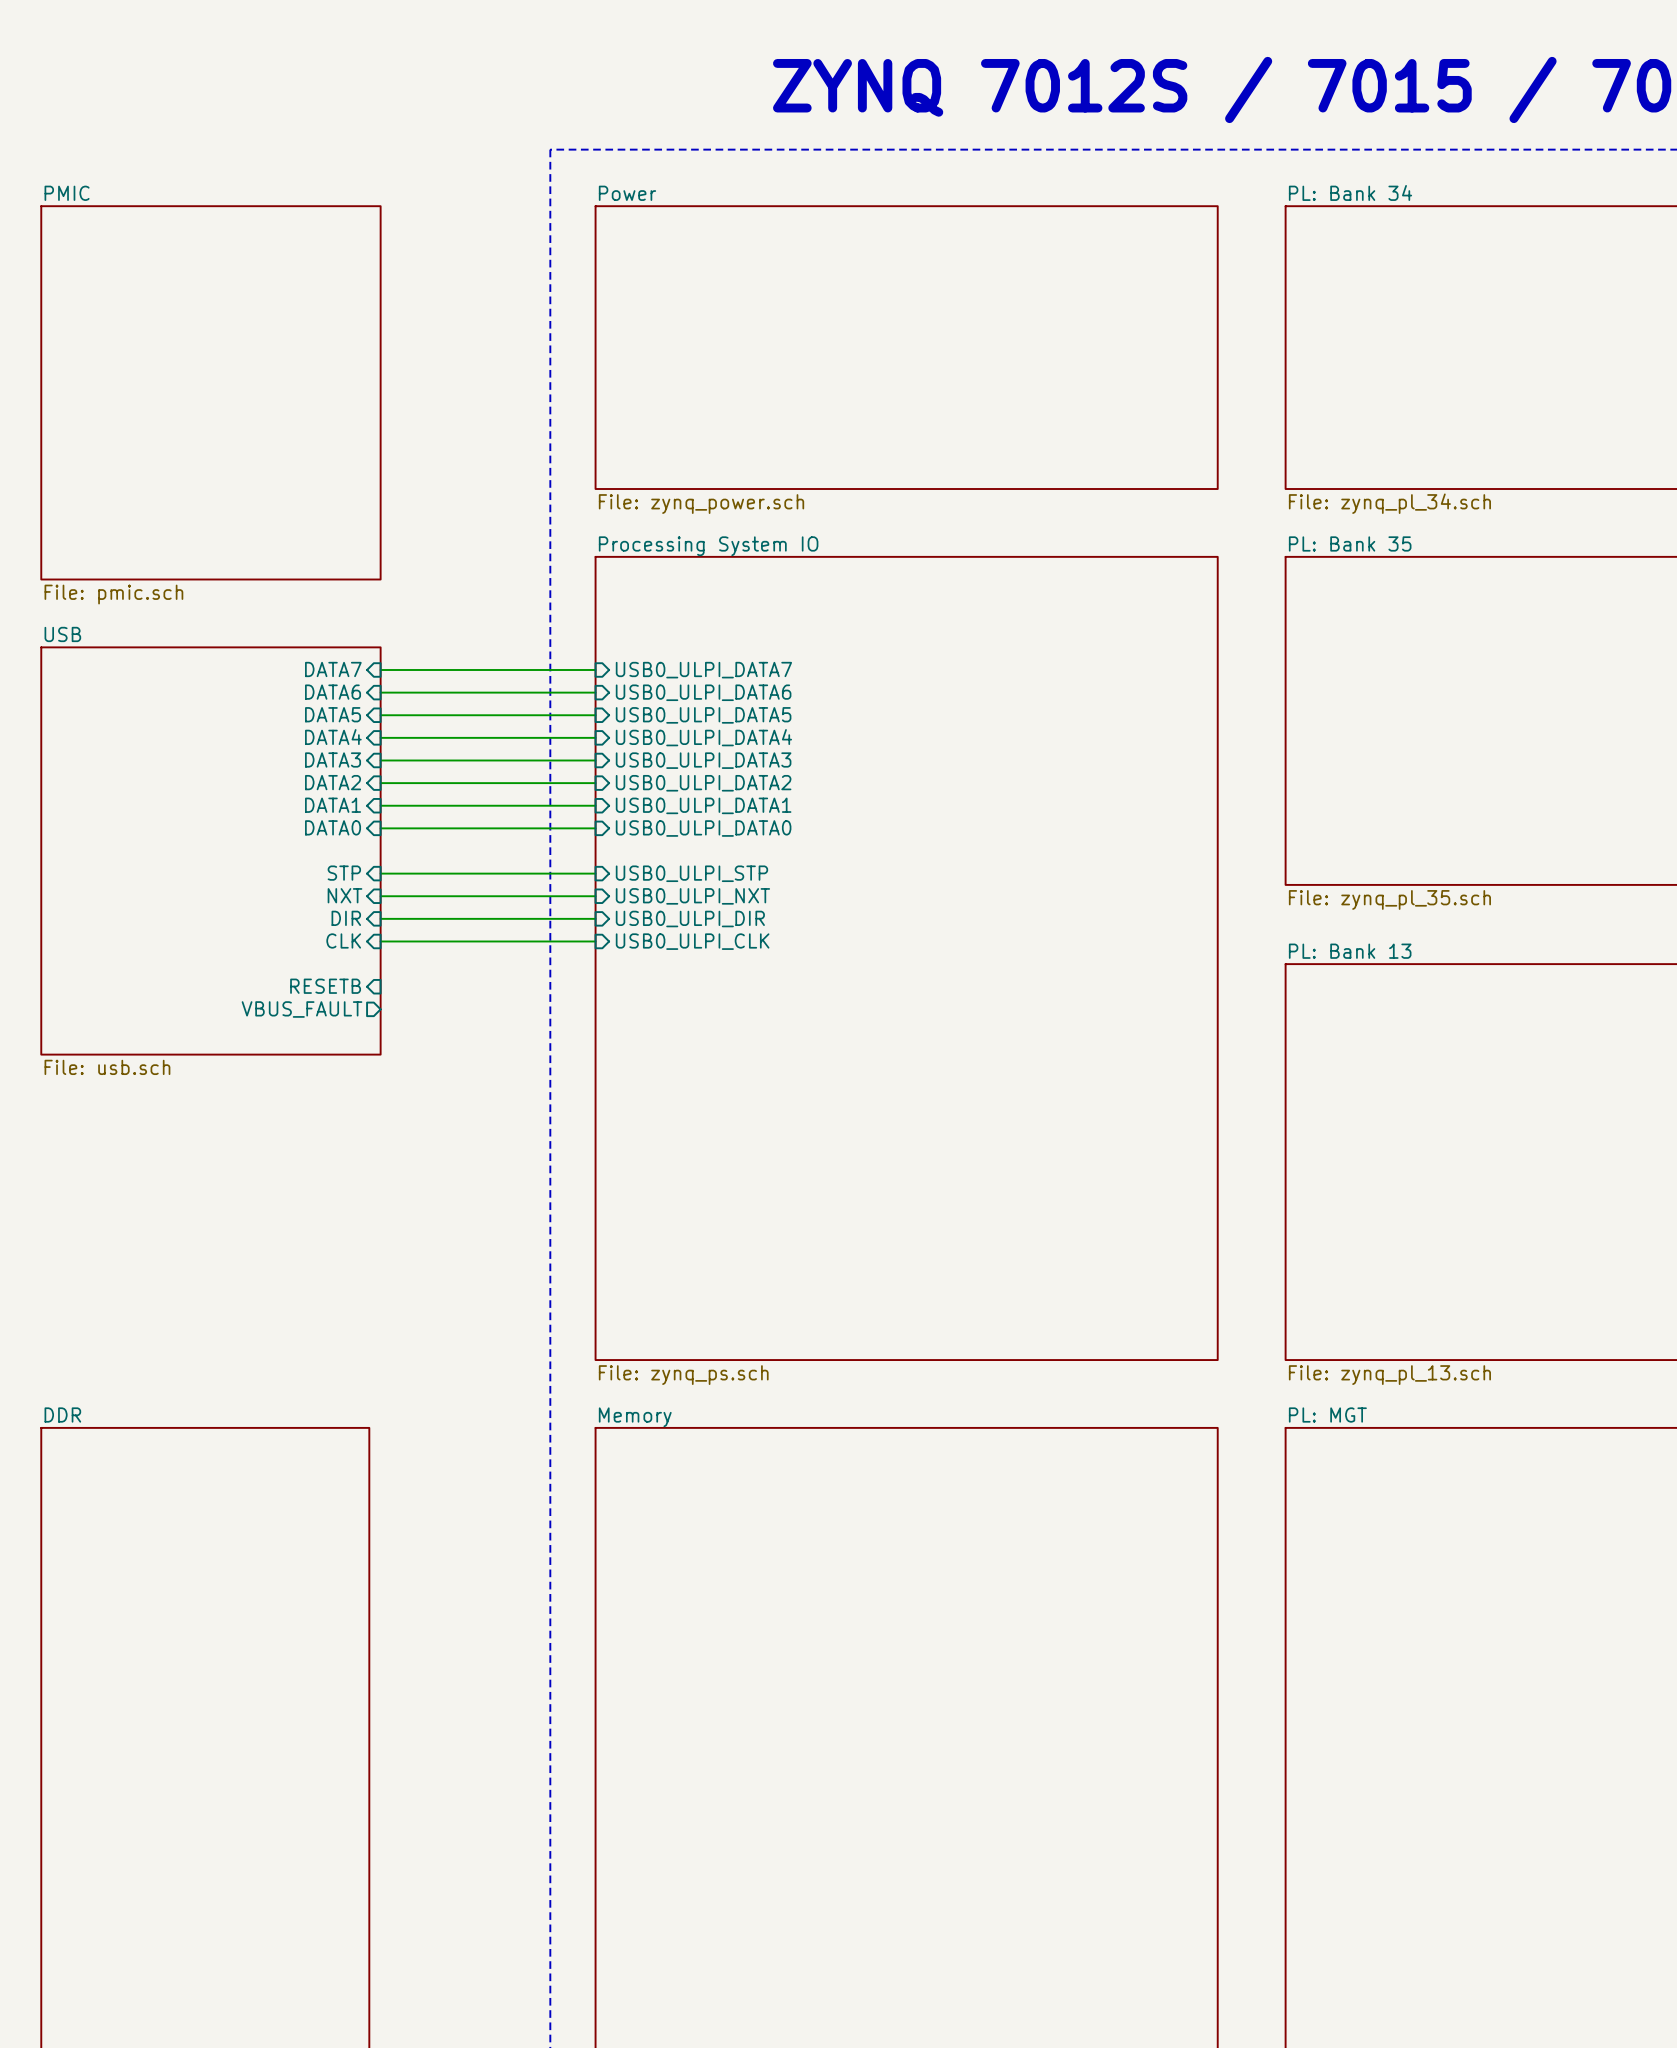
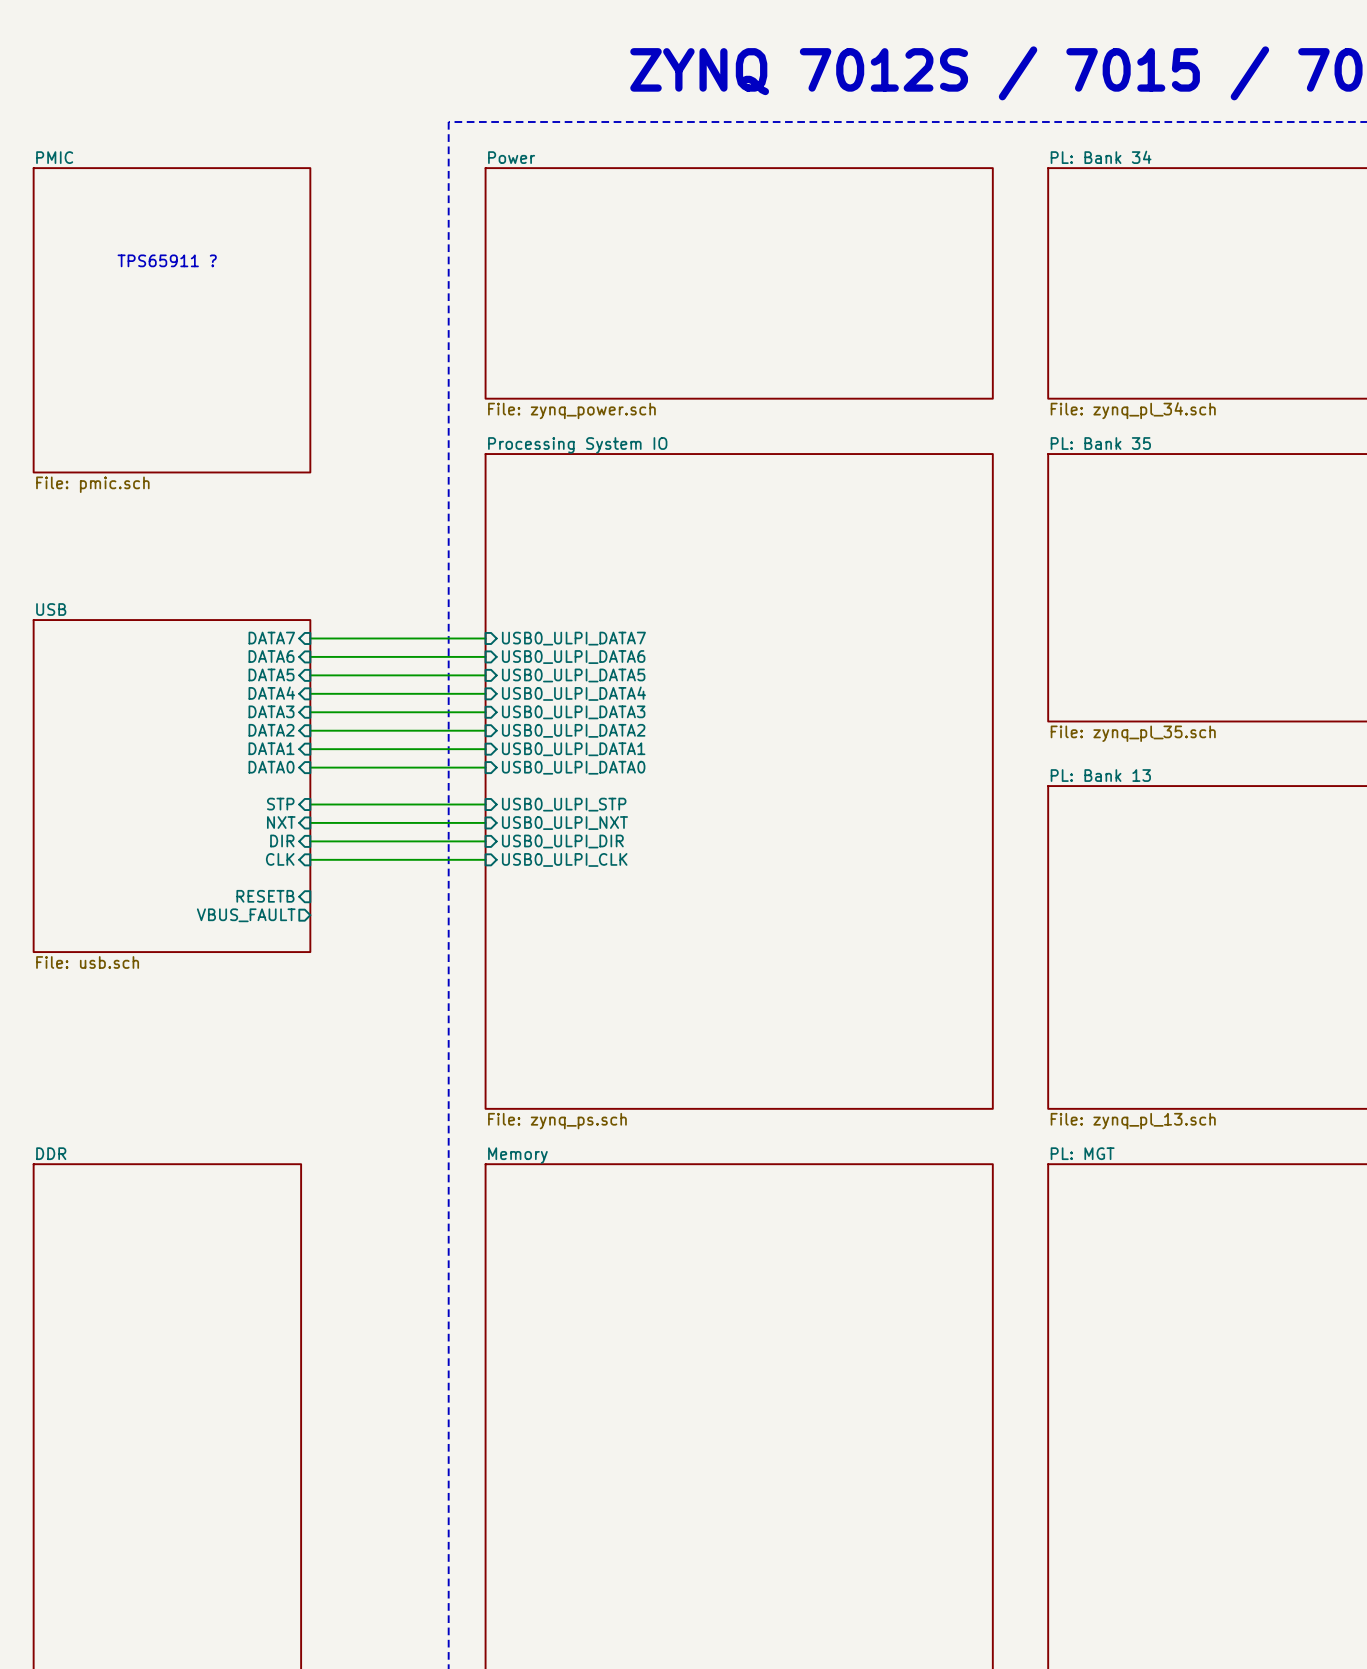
text: none -> TPS65911 ? (167, 260)
sheet pin: DATA7 (333, 669) -> none
wire: (380, 669) (595, 669) -> none
sheet pin: USB0_ULPI_DATA7 (703, 670) -> none
sheet pin: DATA6 (333, 692) -> none
wire: (380, 692) (595, 692) -> none
sheet pin: USB0_ULPI_DATA6 (703, 692) -> none
sheet pin: DATA5 (333, 714) -> none
wire: (380, 715) (595, 715) -> none
sheet pin: USB0_ULPI_DATA5 (703, 715) -> none
sheet pin position: DATA4 (333, 737) -> DATA4 (271, 693)
wire: (380, 737) (595, 737) -> none
sheet pin position: USB0_ULPI_DATA4 (703, 737) -> USB0_ULPI_DATA4 (573, 693)
sheet pin: DATA3 (333, 759) -> none
wire: (380, 760) (595, 760) -> (310, 693) (485, 693)
sheet pin: USB0_ULPI_DATA3 (703, 760) -> none
sheet pin: DATA2 (333, 782) -> DATA7 (271, 638)
sheet pin: USB0_ULPI_DATA2 (703, 783) -> USB0_ULPI_DATA7 (573, 638)
sheet pin: DATA1 (333, 805) -> DATA6 (271, 656)
sheet pin: USB0_ULPI_DATA1 (703, 805) -> USB0_ULPI_DATA6 (573, 657)
sheet pin: DATA0 (333, 827) -> DATA5 (271, 674)
sheet pin: USB0_ULPI_DATA0 (703, 828) -> USB0_ULPI_DATA5 (573, 675)
sheet USB position: (210, 850) -> (171, 786)
sheet pin: STP (344, 873) -> DATA3 (271, 711)
sheet pin: USB0_ULPI_STP (691, 873) -> USB0_ULPI_DATA3 (573, 712)
sheet pin: NXT (344, 895) -> DATA2 (271, 730)
sheet pin: USB0_ULPI_NXT (692, 896) -> USB0_ULPI_DATA2 (573, 730)
sheet pin: DIR (346, 918) -> DATA1 (271, 748)
sheet pin: USB0_ULPI_DIR (690, 919) -> USB0_ULPI_DATA1 (573, 749)
sheet pin: CLK (343, 940) -> DATA0 (271, 767)
sheet pin: USB0_ULPI_CLK (692, 941) -> USB0_ULPI_DATA0 (573, 767)
sheet pin: RESETB (325, 986) -> STP (280, 804)
wire: none -> (310, 804) (485, 804)
sheet pin: none -> USB0_ULPI_STP (564, 804)
sheet pin shape: output (302, 1009) -> input (281, 822)
sheet pin: VBUS_FAULT (302, 1009) -> NXT (281, 822)
wire: none -> (310, 822) (485, 822)
sheet pin: none -> USB0_ULPI_NXT (564, 823)
sheet pin: none -> DIR (282, 840)
wire: none -> (310, 841) (485, 841)
sheet pin: none -> USB0_ULPI_DIR (562, 841)
sheet pin: none -> CLK (280, 859)
wire: none -> (310, 859) (485, 859)
sheet pin: none -> USB0_ULPI_CLK (564, 859)
sheet pin: none -> RESETB (265, 896)
sheet pin: none -> VBUS_FAULT (246, 915)

